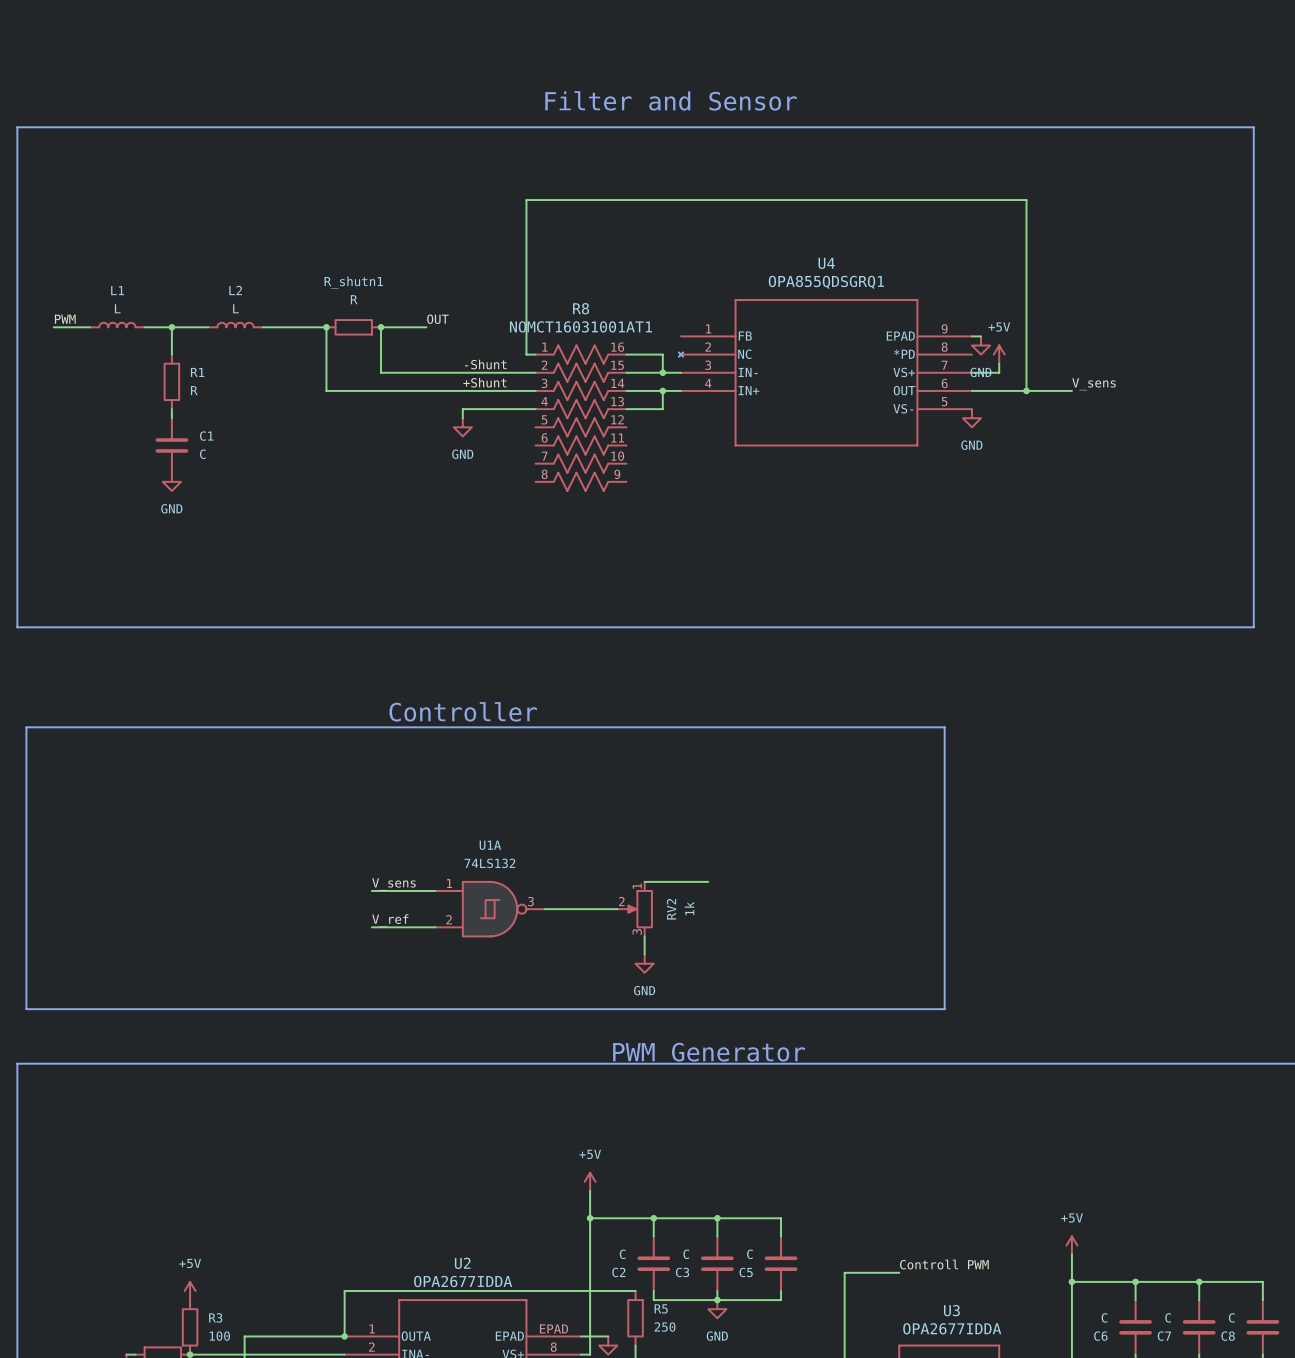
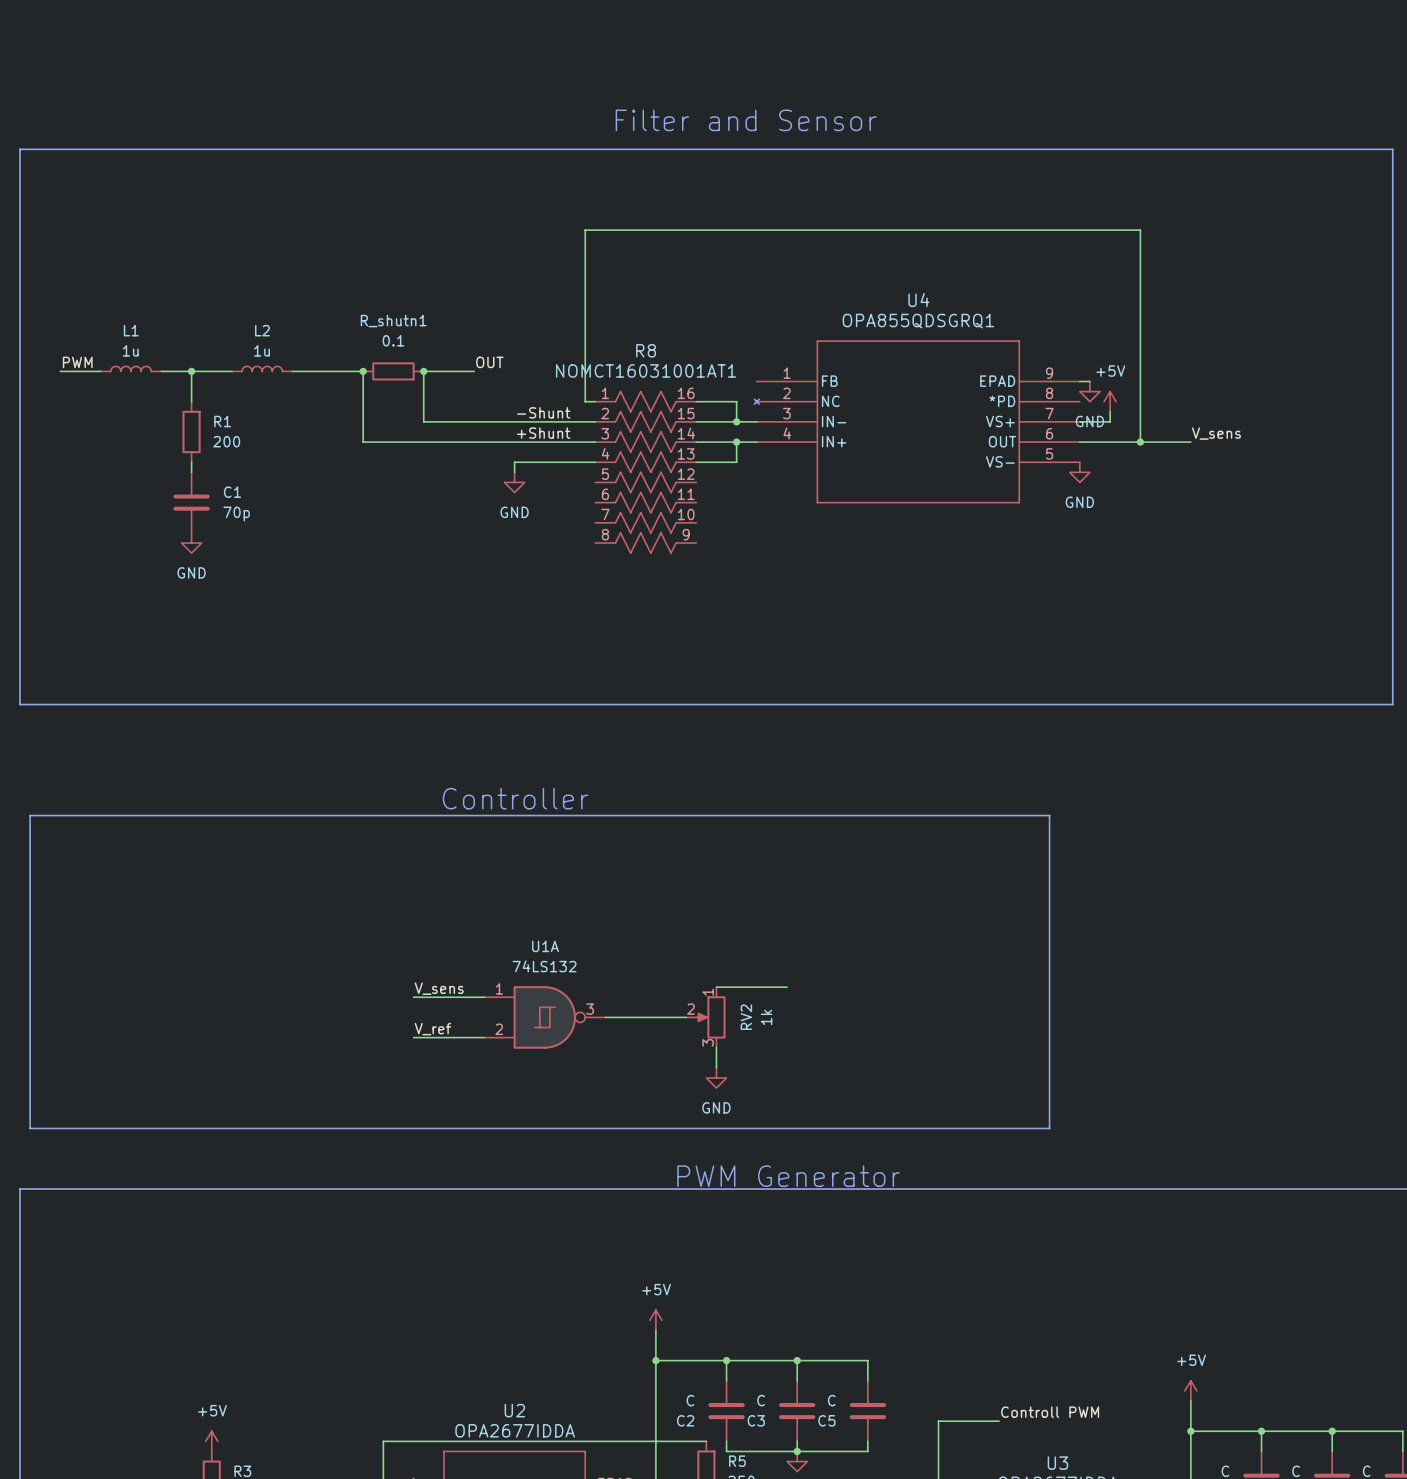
R_shutn1 value: R (354, 299) -> 0.1 (393, 340)
L1 value: L (117, 308) -> 1u (130, 350)
L2 value: L (235, 308) -> 1u (261, 350)
R1 value: R (194, 390) -> 200 (226, 441)
C1 value: C (202, 454) -> 70p (236, 514)

